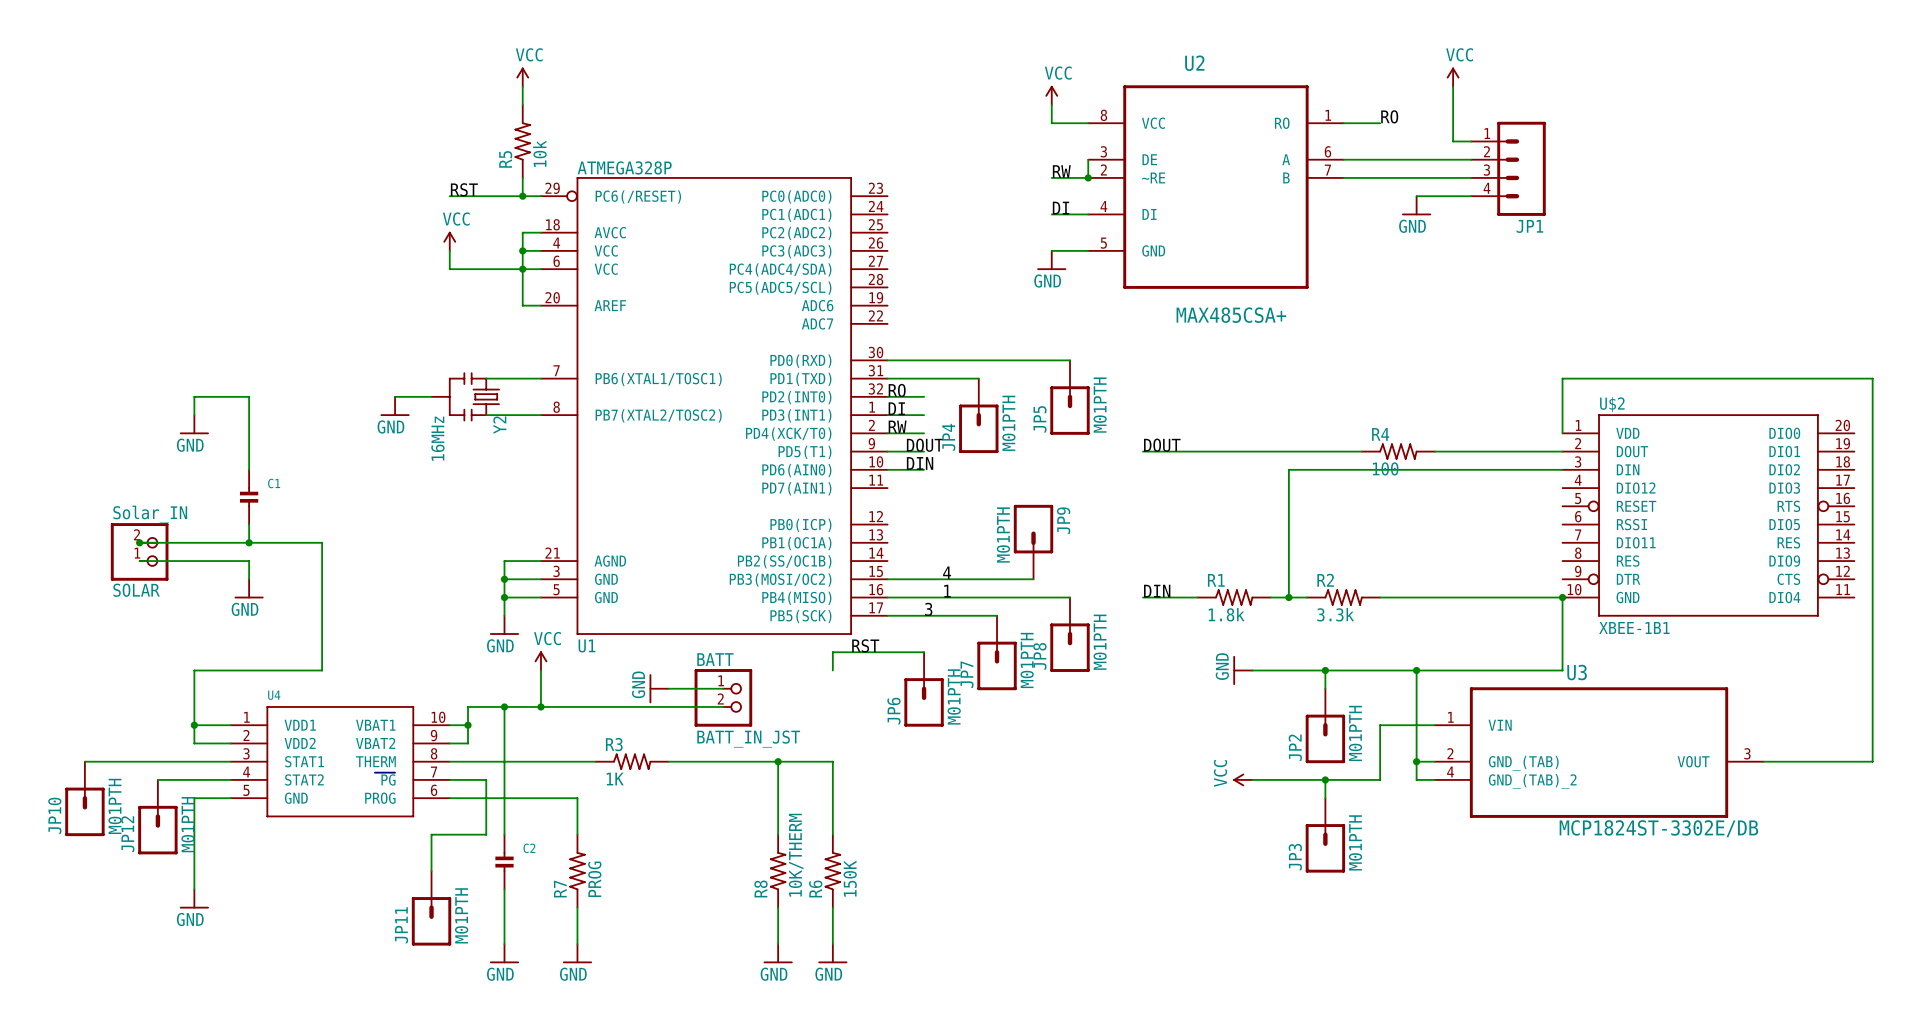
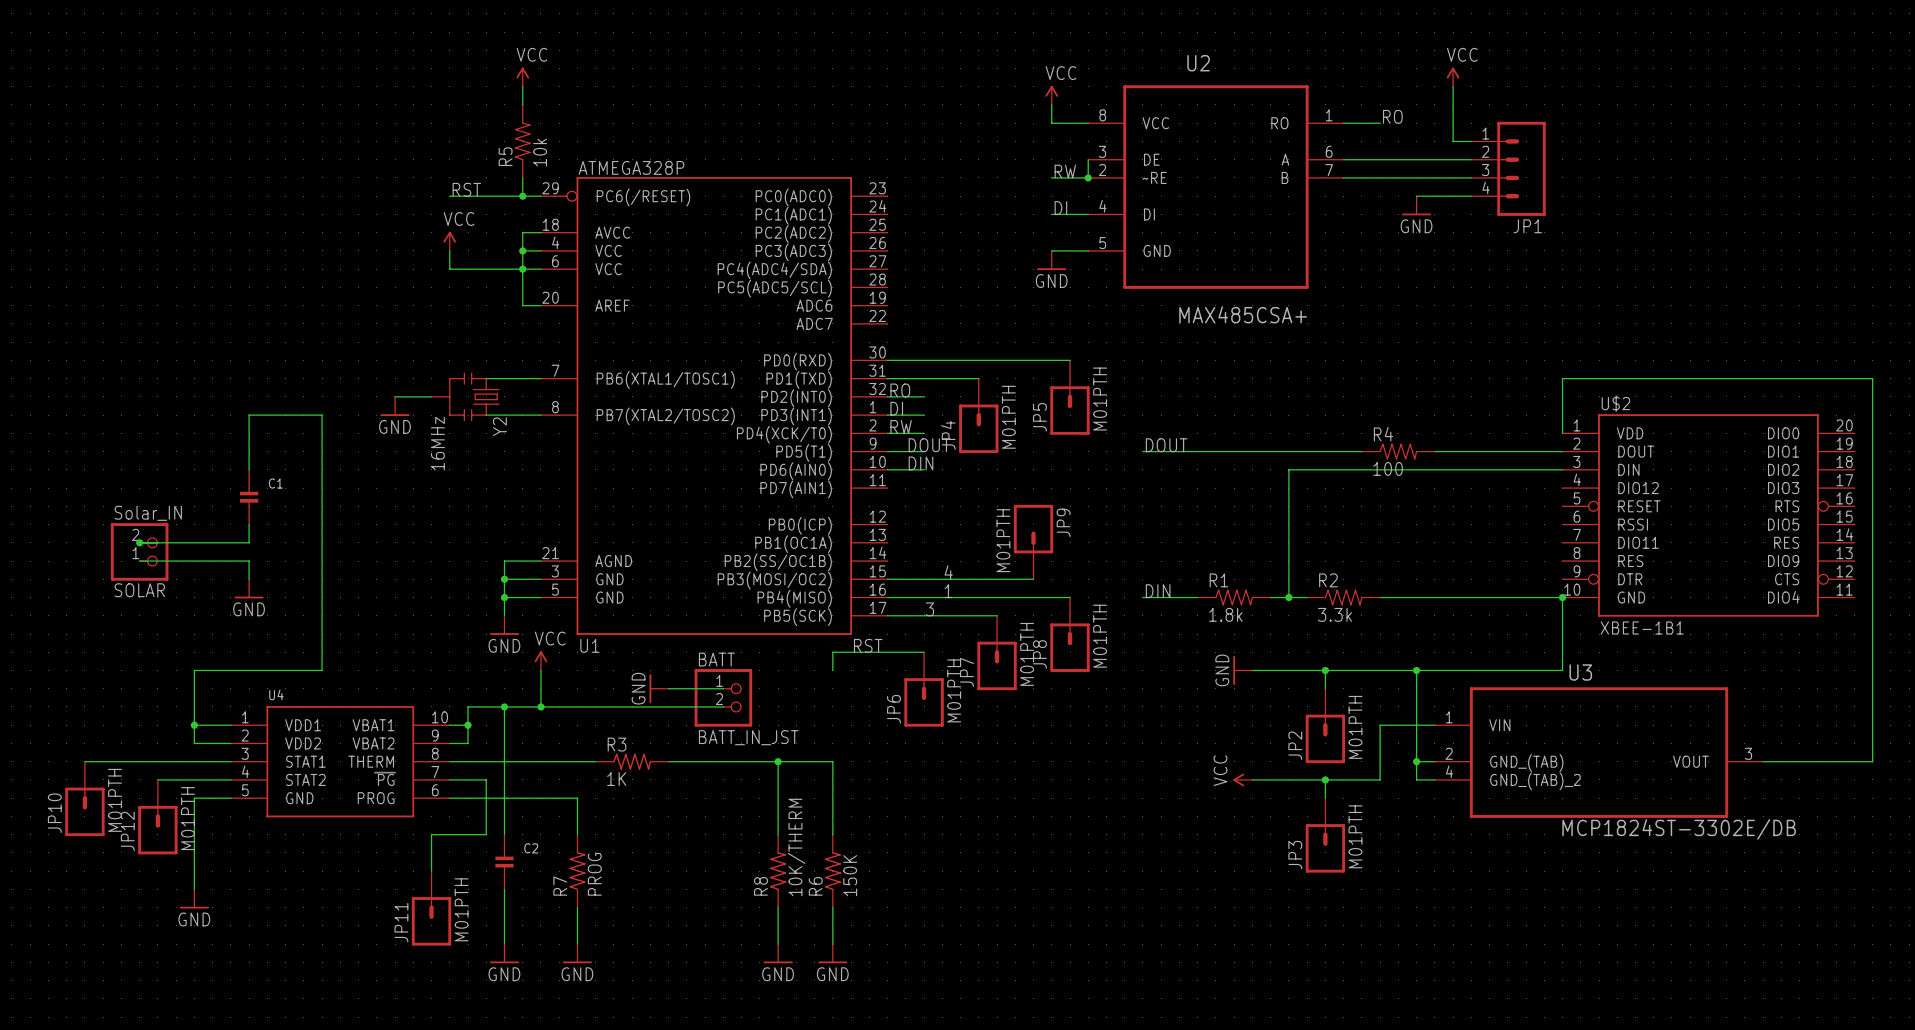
wire: (194, 415) (194, 396) (249, 396) (249, 415) -> none
power symbol: GND (194, 424) -> none
wire: (249, 542) (322, 542) -> (249, 415) (322, 415) (322, 542)
junction: (249, 542) -> none

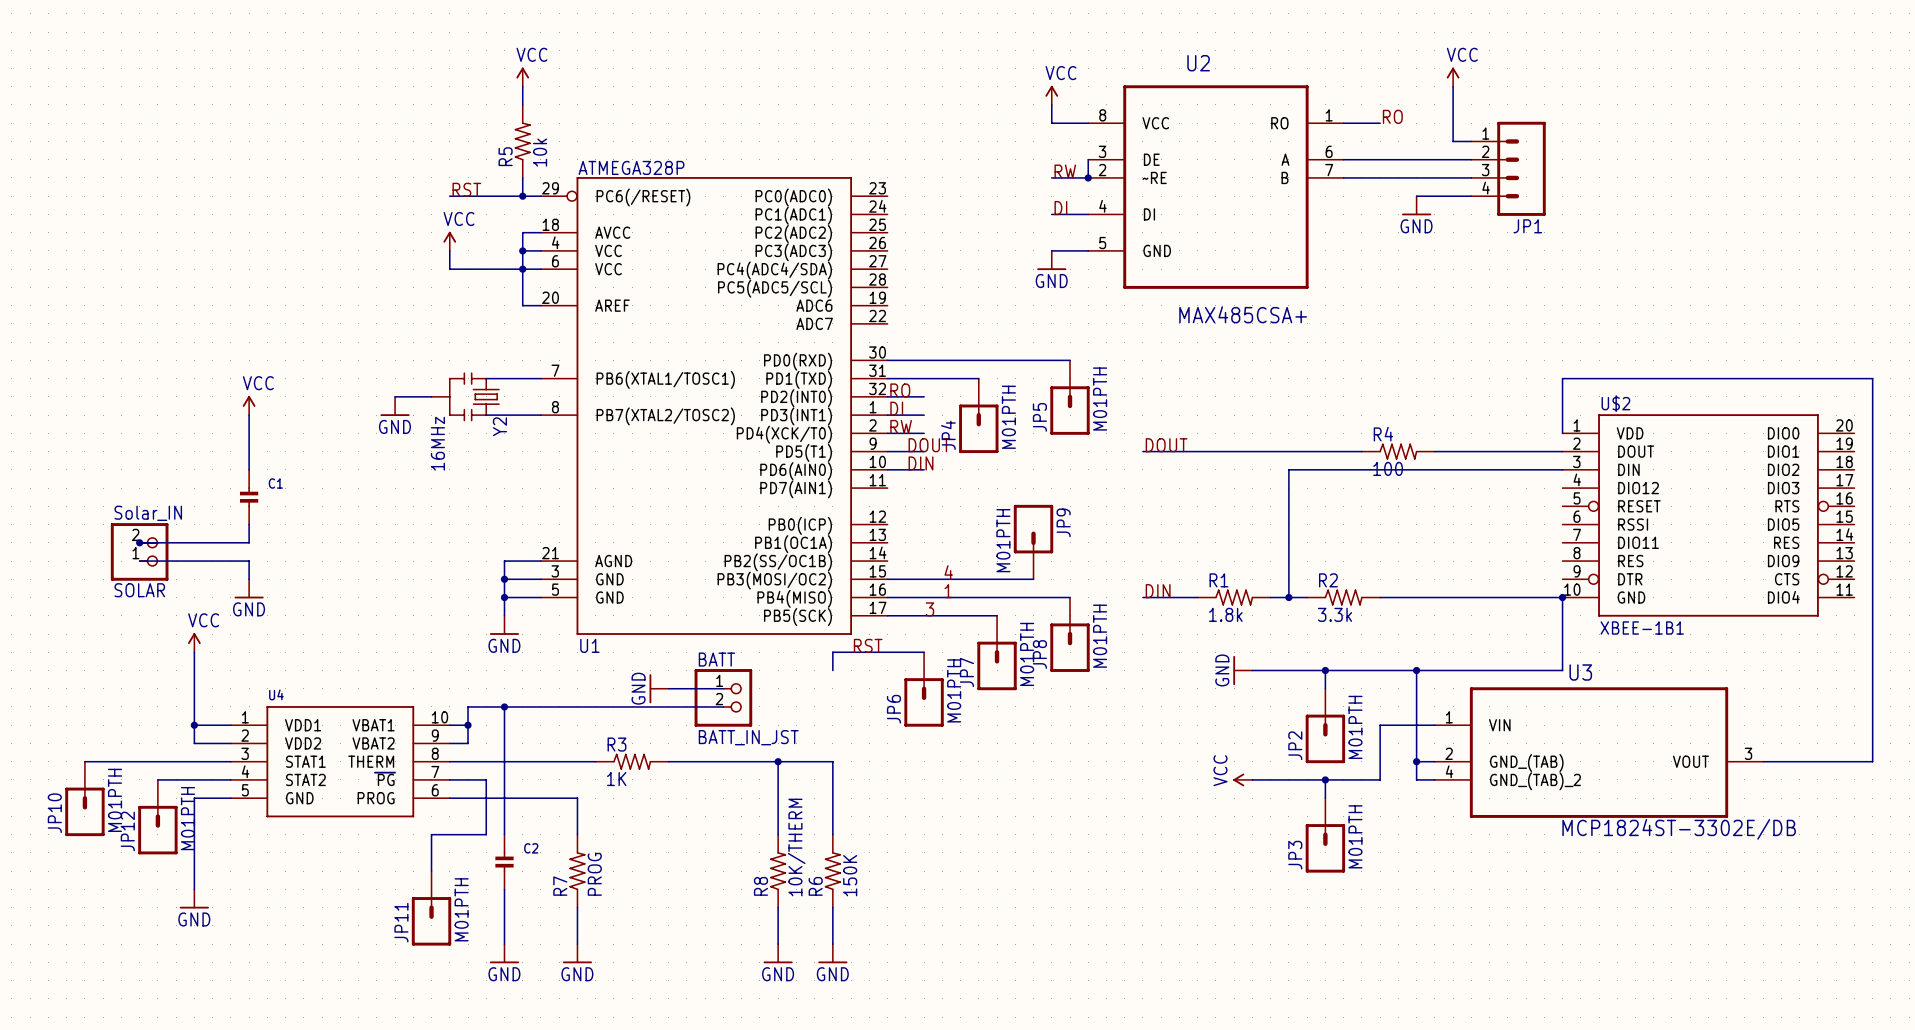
power symbol: none -> VCC (249, 405)
wire: (249, 415) (322, 415) (322, 670) (194, 670) -> (194, 652) (194, 670)
power symbol: none -> VCC (194, 642)
power symbol: VCC (540, 660) -> none
wire: (540, 670) (540, 706) -> none
junction: (540, 706) -> none

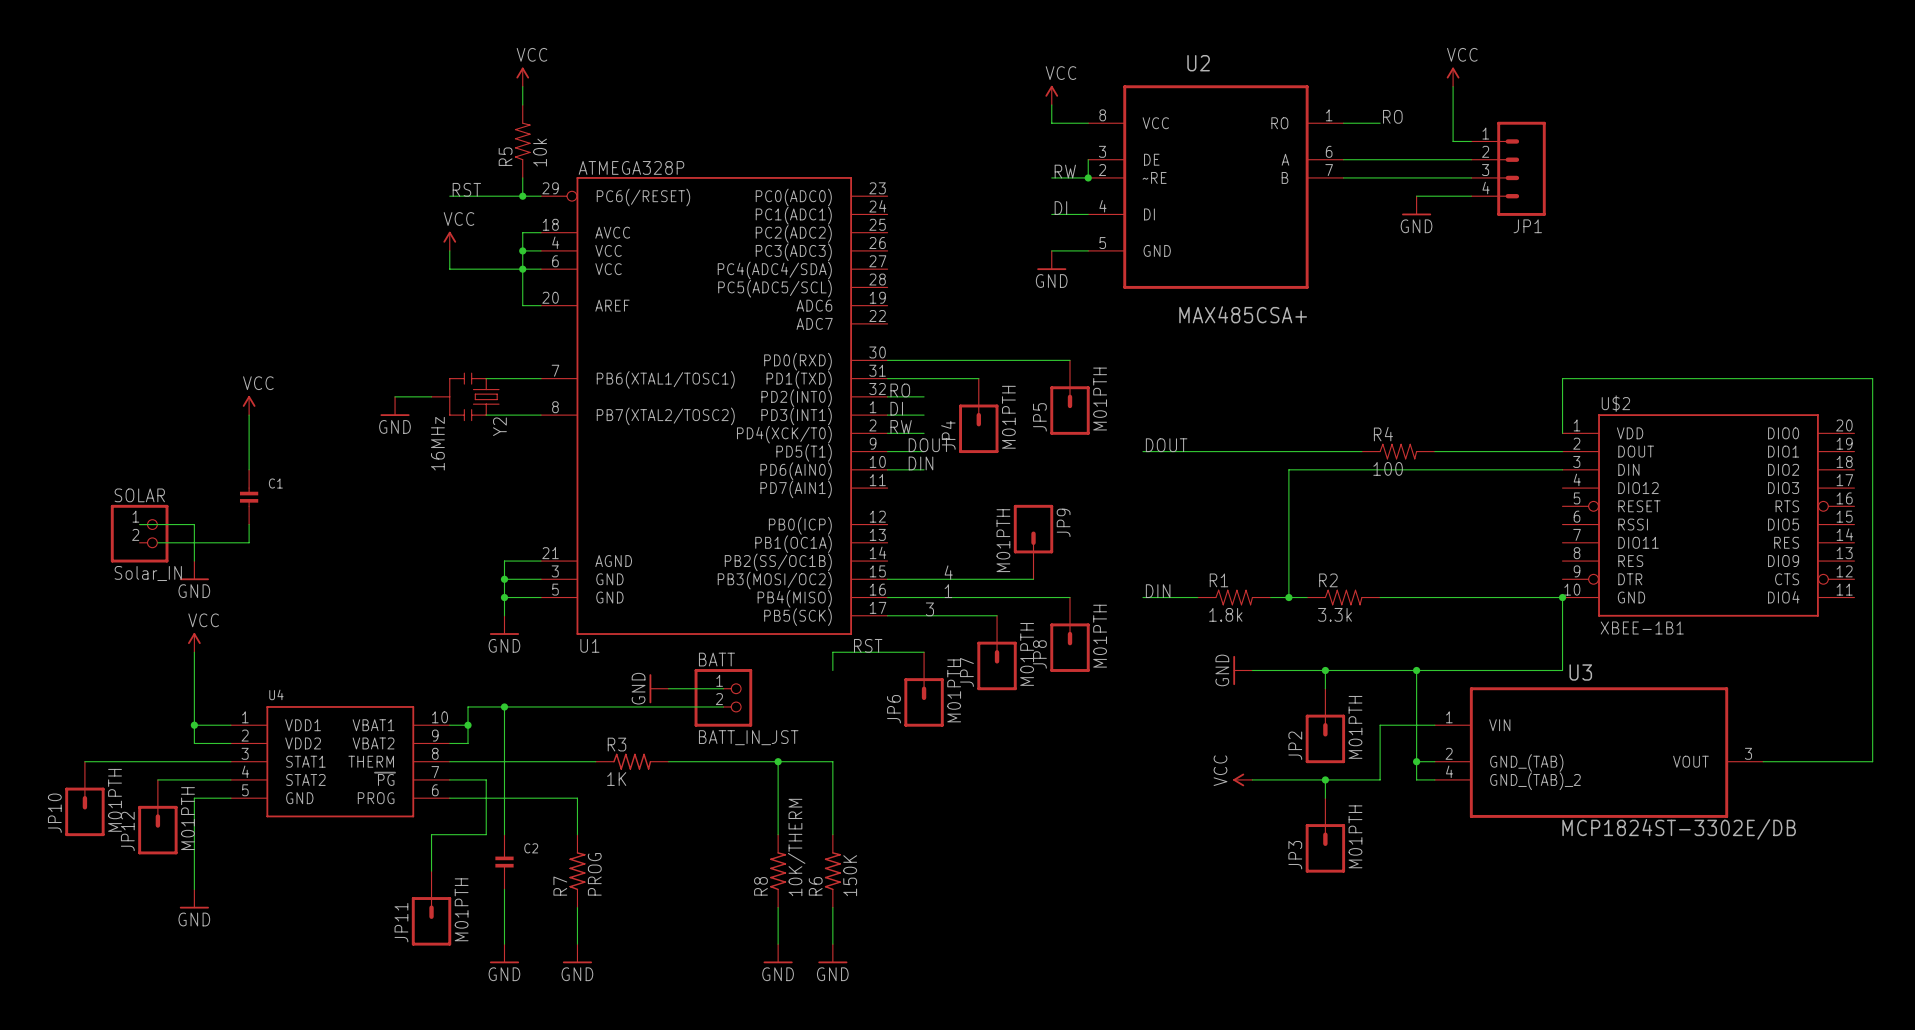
wire: none -> (139, 524) (194, 524) (194, 561)
SOLAR: none -> Solar_IN (139, 533)
junction: (139, 542) -> none
SOLAR: Solar_IN (139, 551) -> none
wire: (139, 561) (249, 561) (249, 579) -> none
power symbol position: GND (249, 588) -> GND (194, 570)

